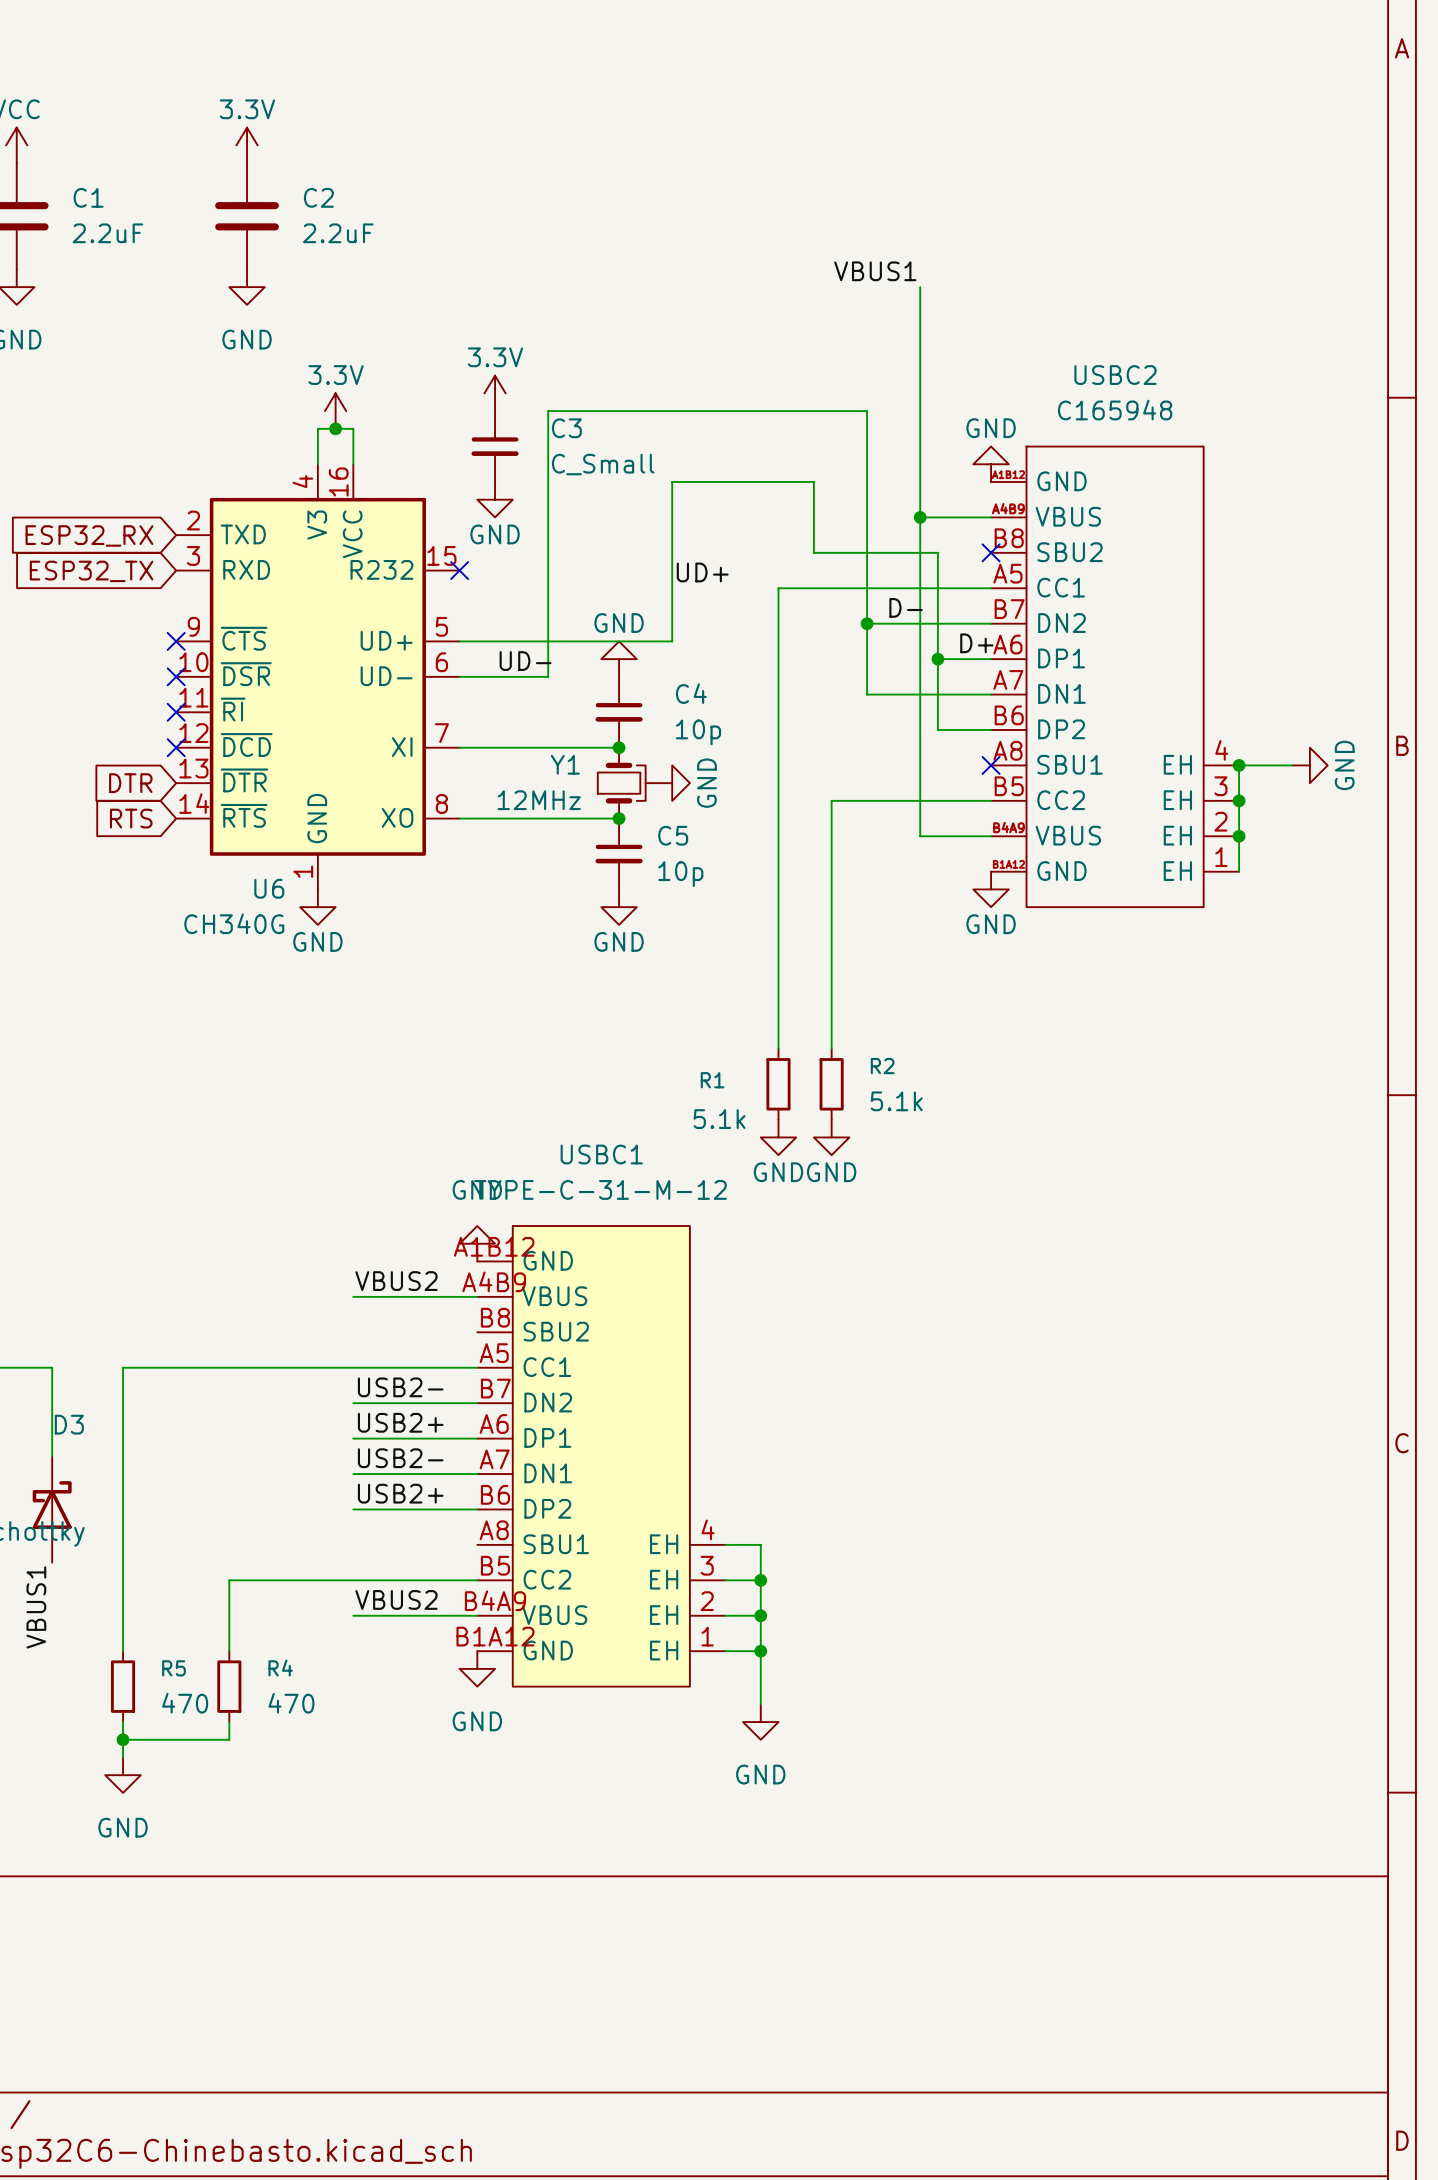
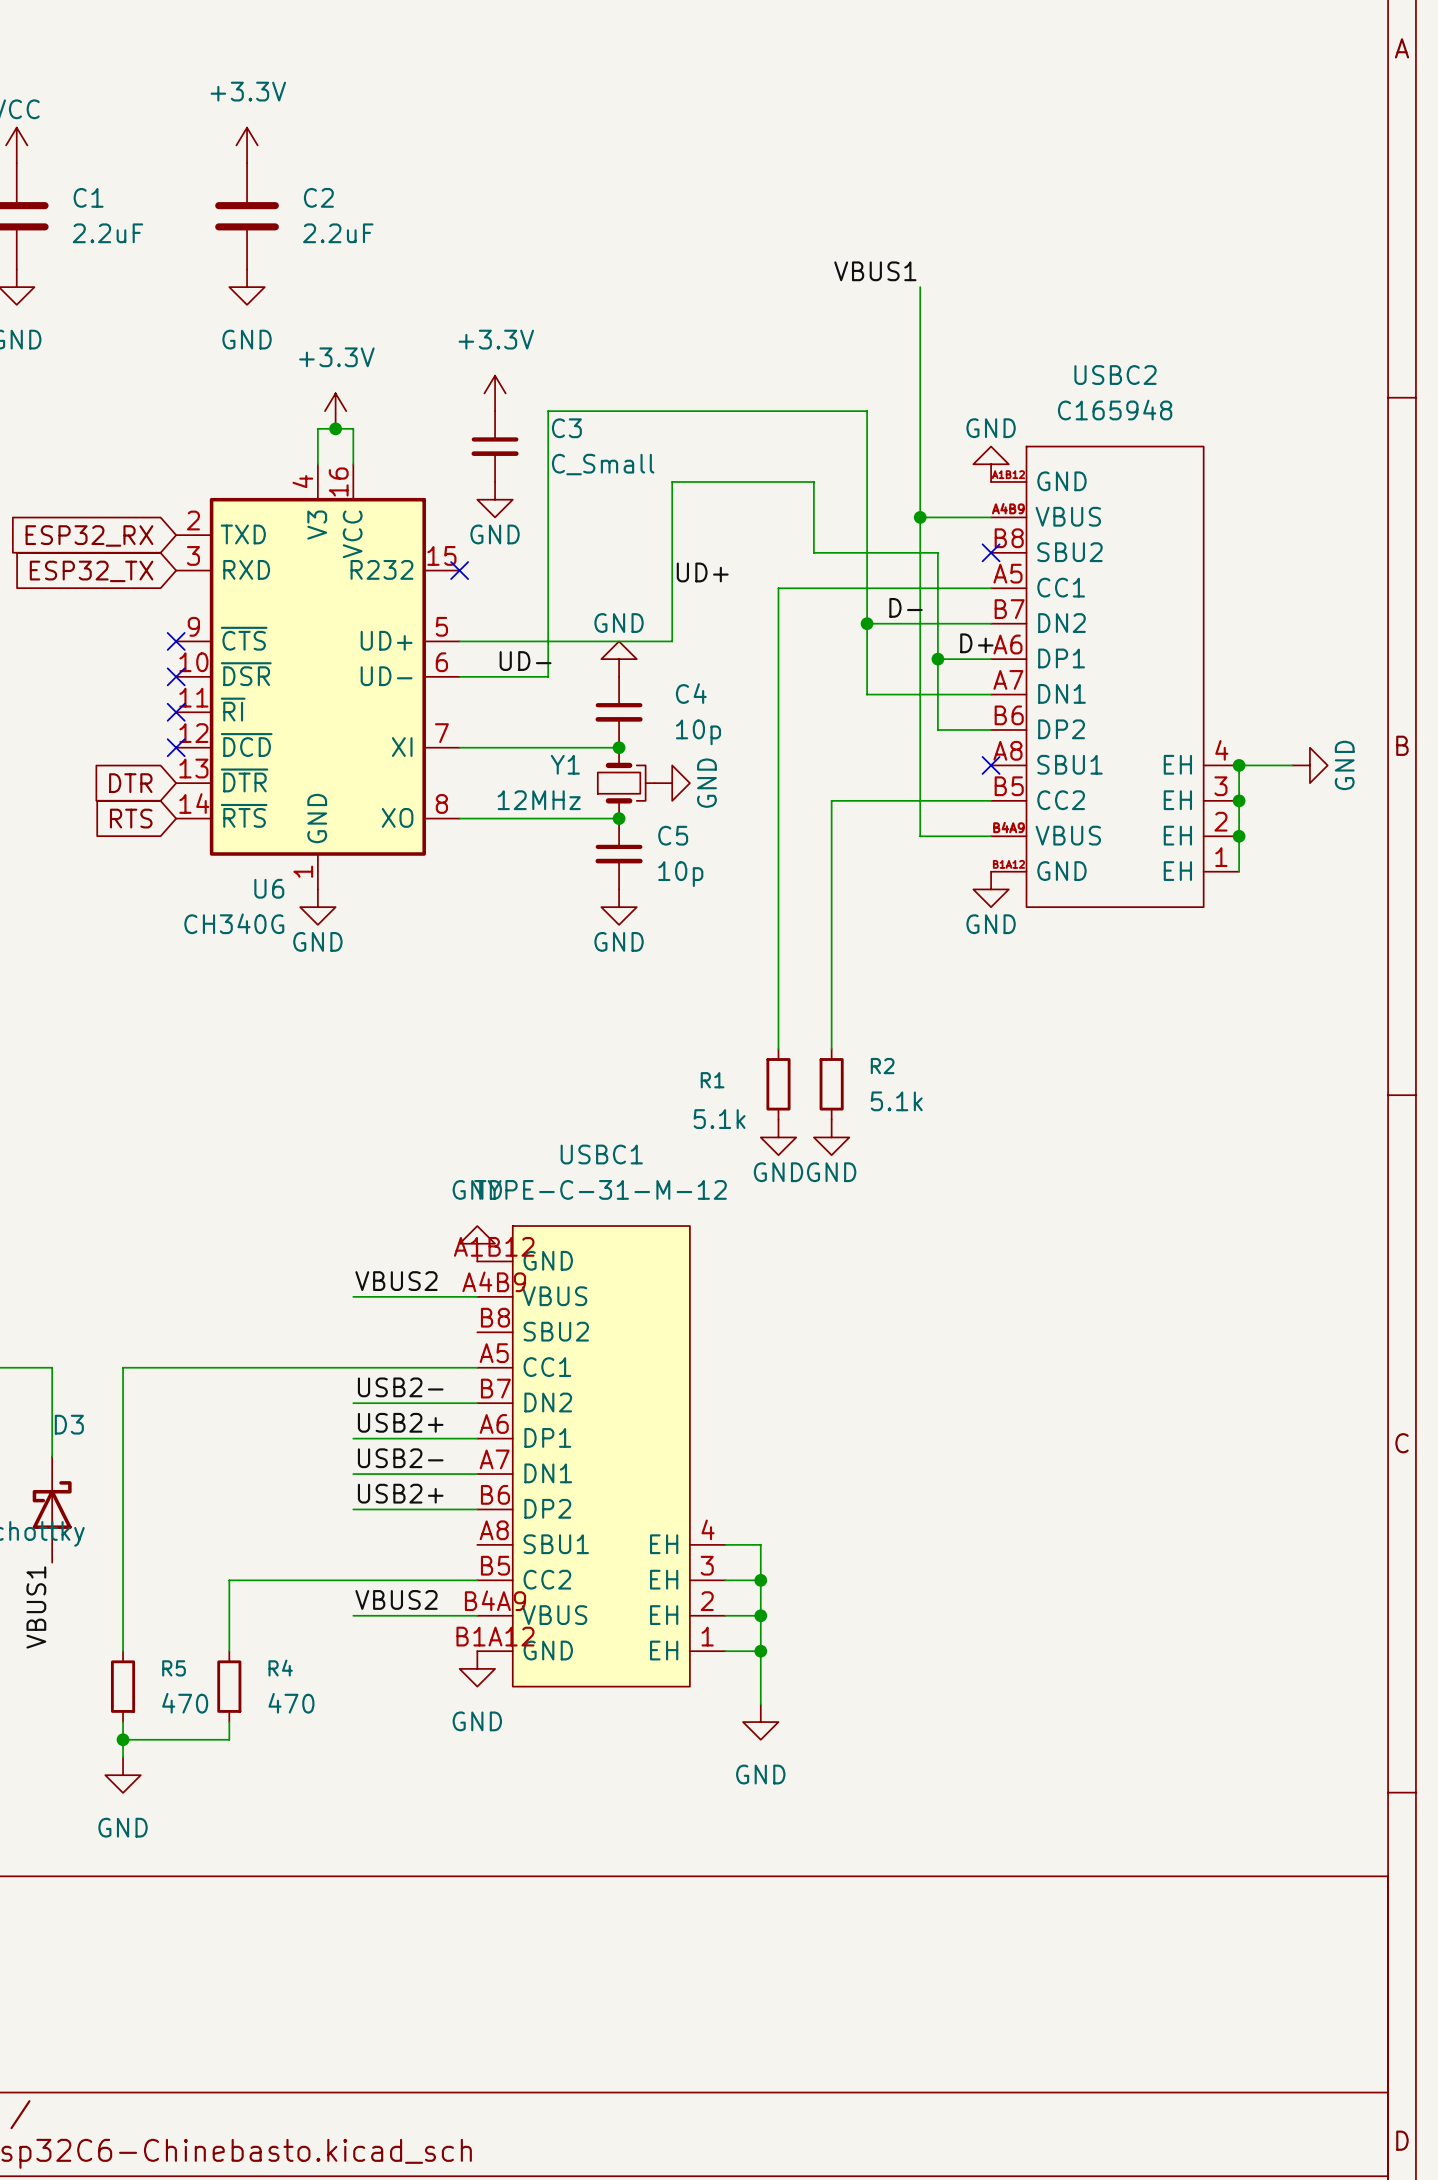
power symbol: 3.3V (247, 145) -> +3.3V (247, 145)
power symbol: 3.3V (495, 393) -> +3.3V (495, 393)
power symbol: 3.3V (335, 411) -> +3.3V (335, 411)

